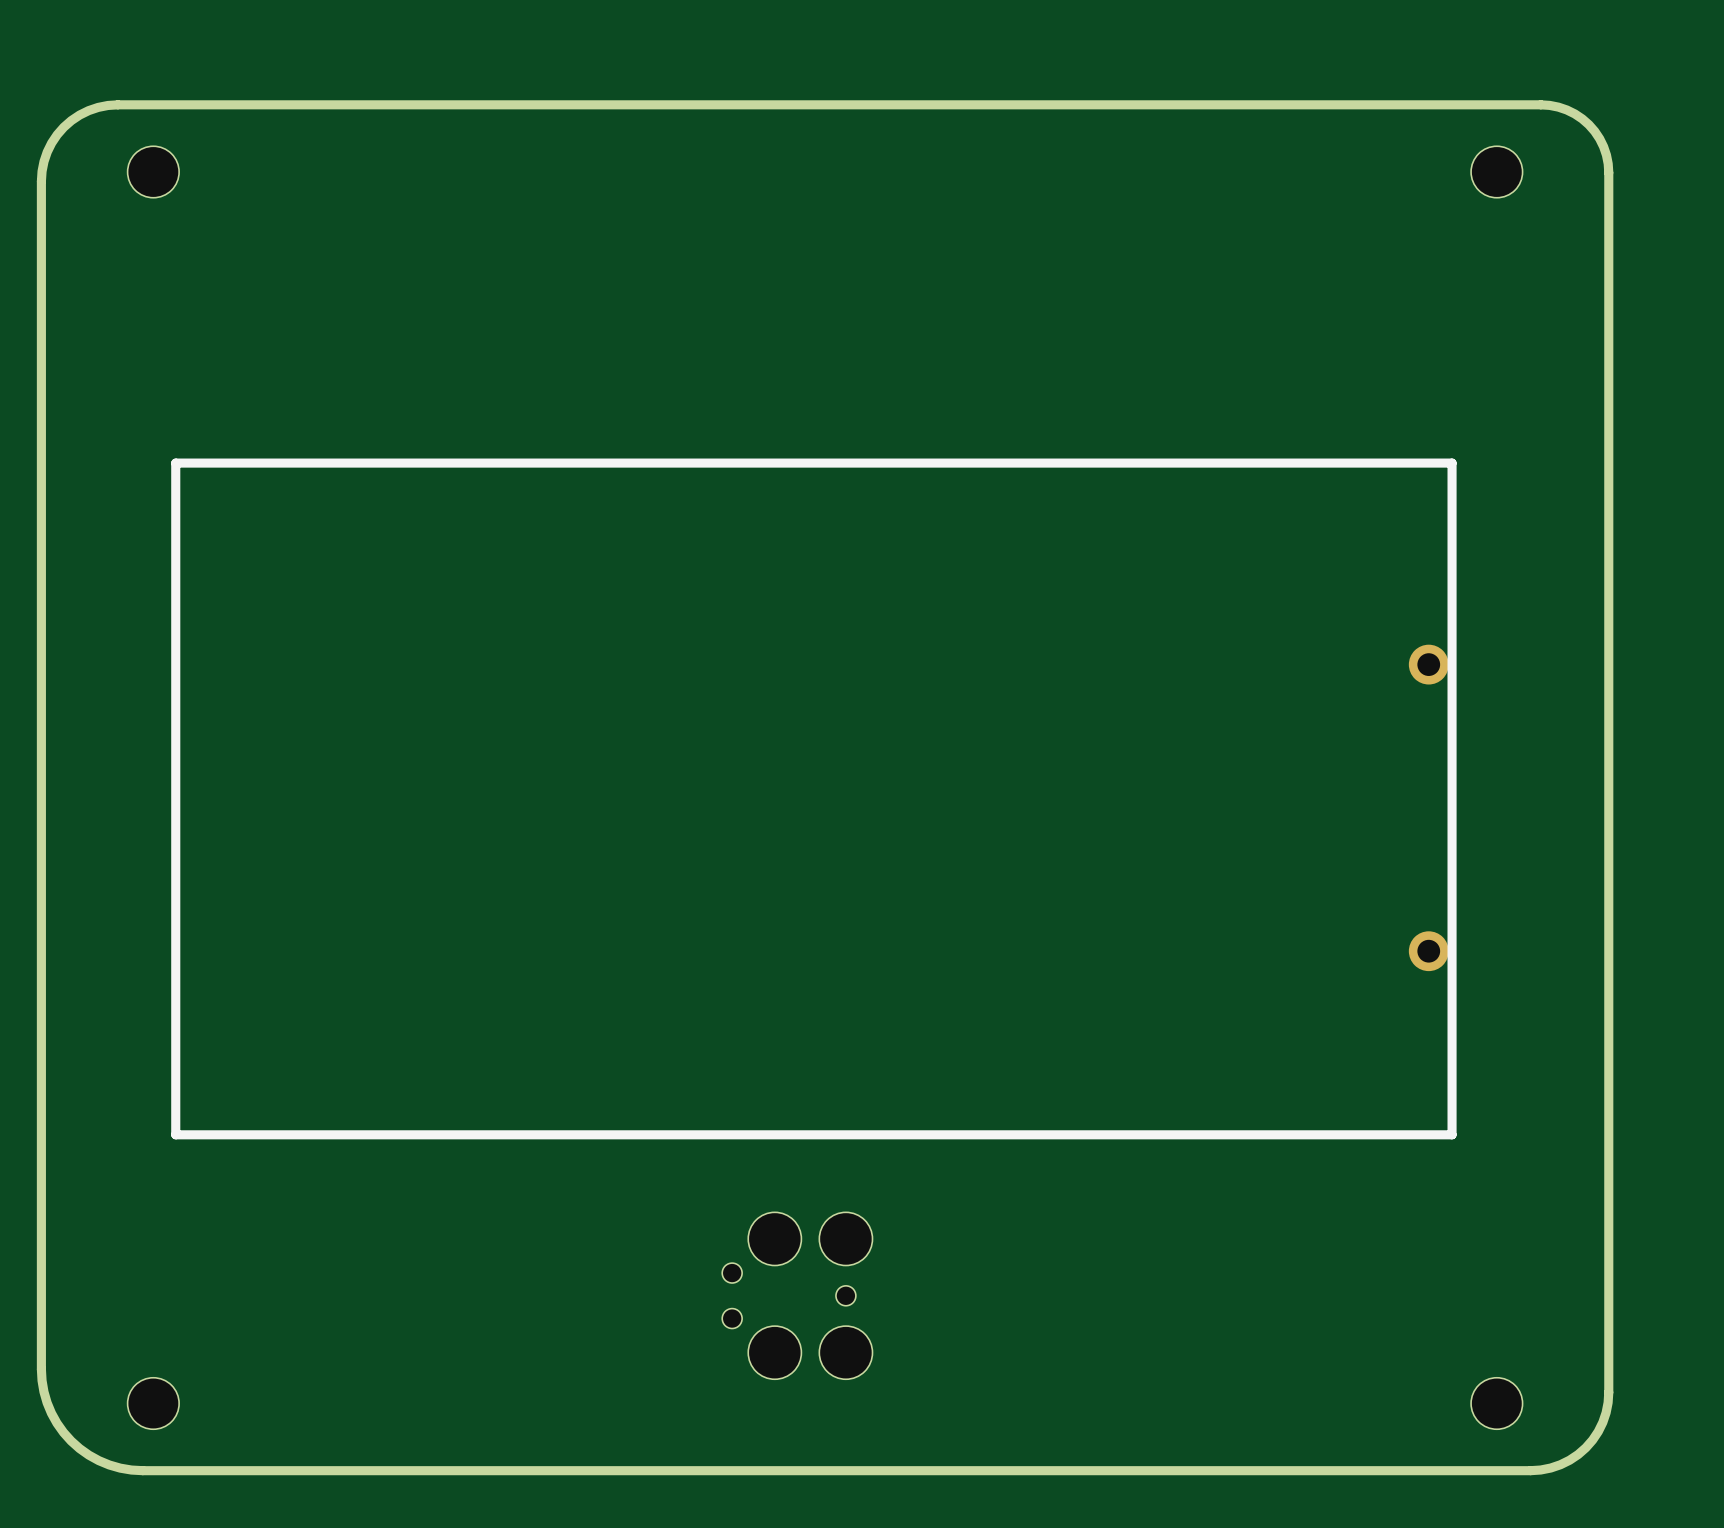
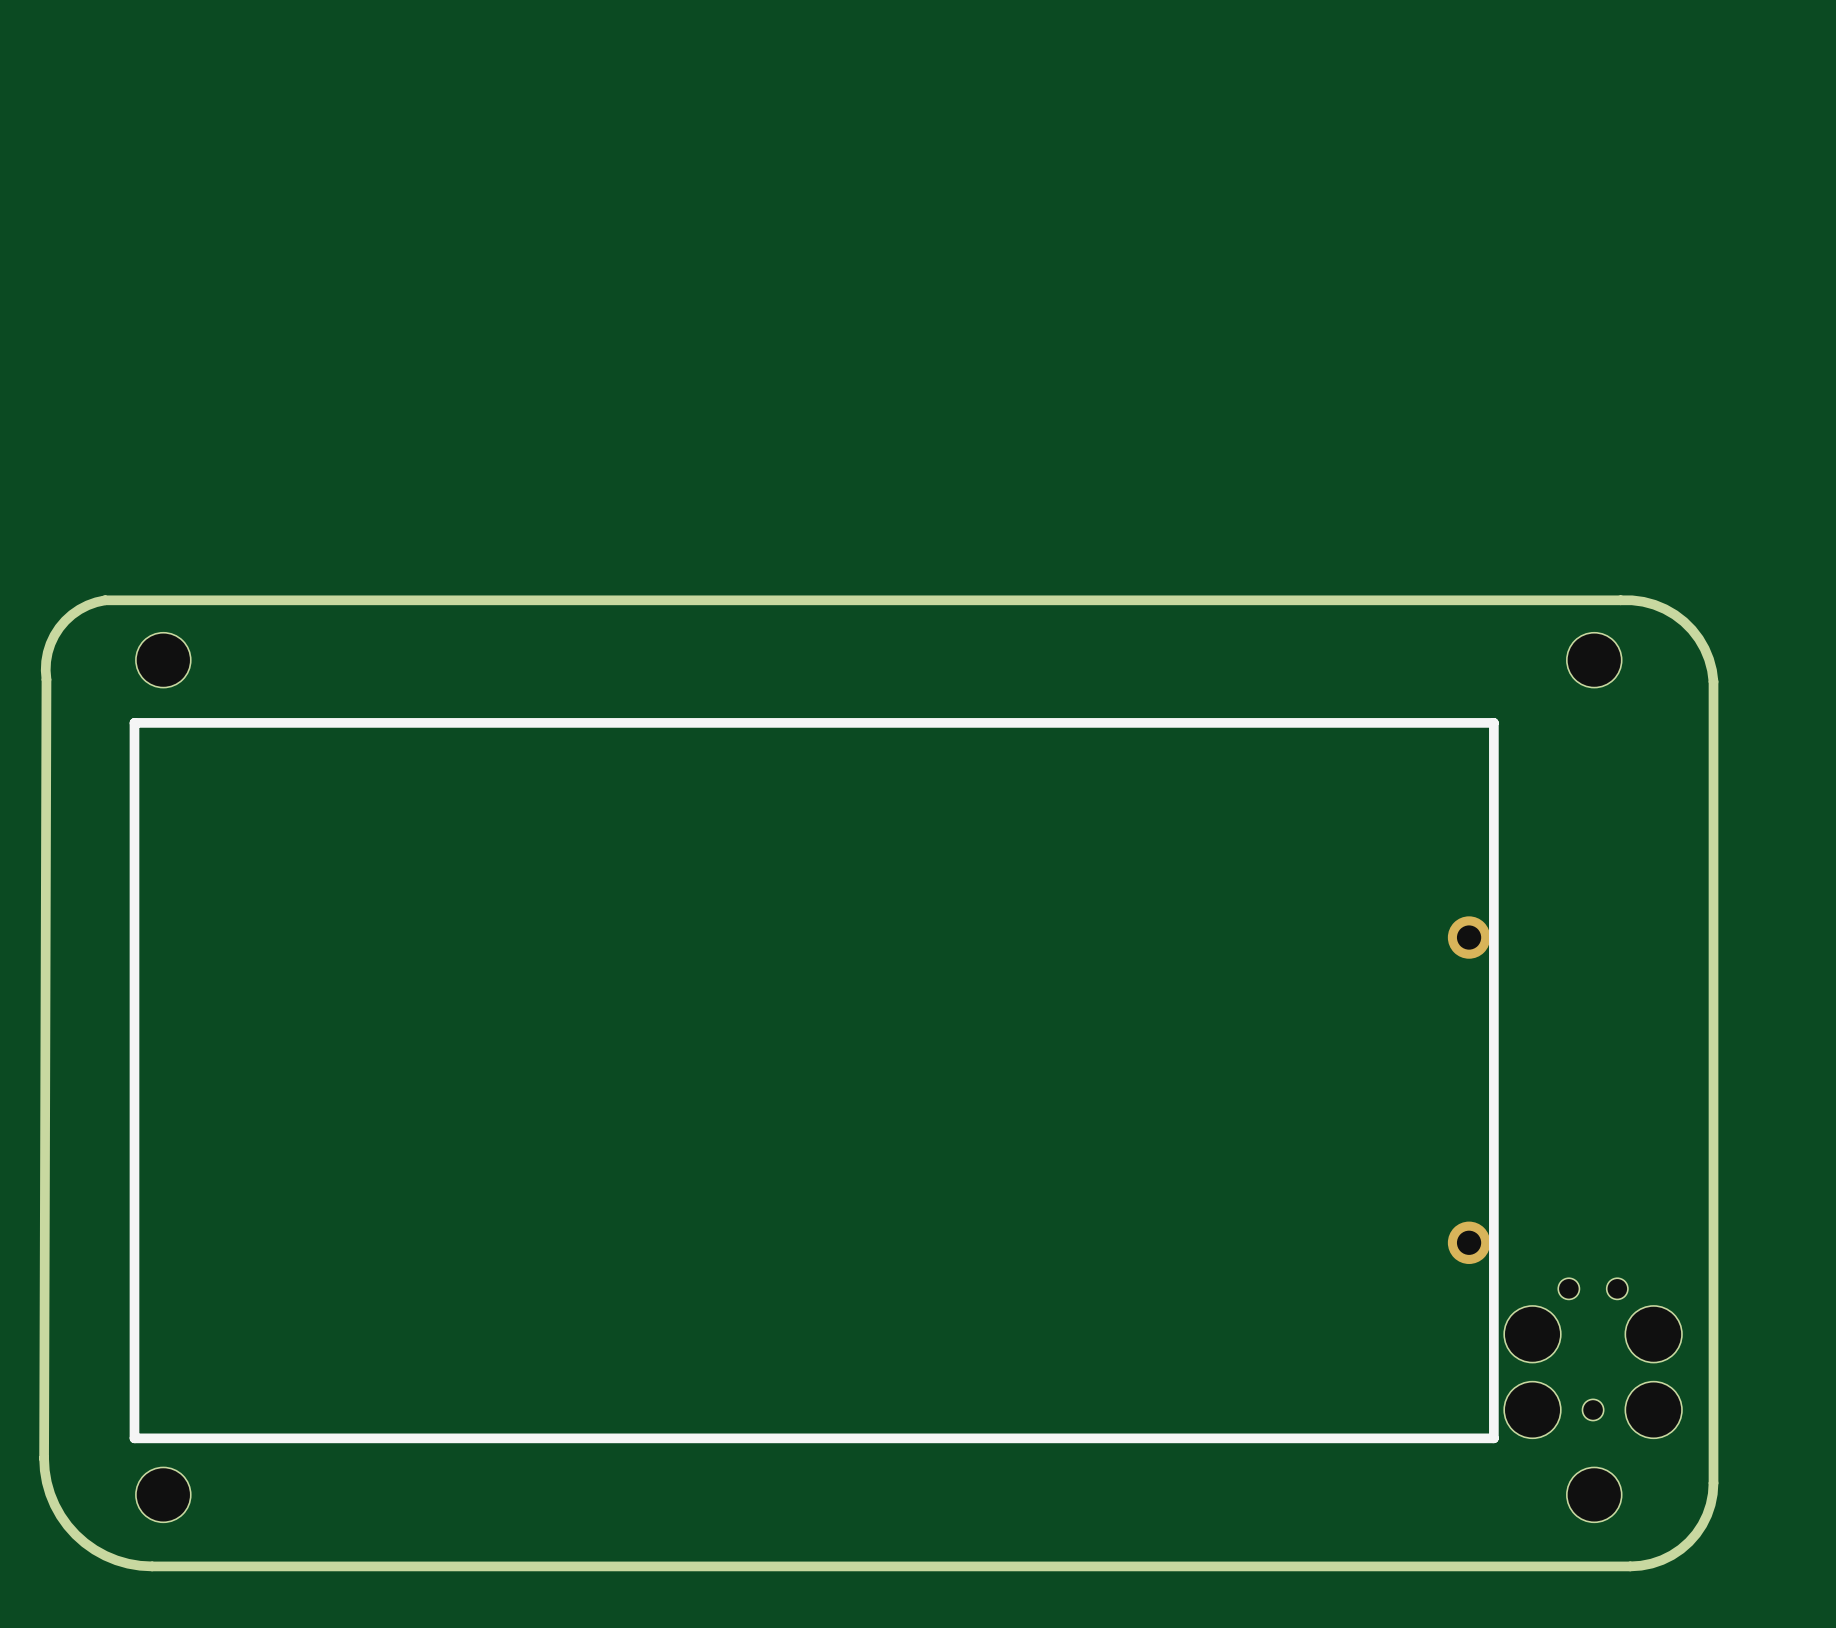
hole position: (153, 171) -> (163, 660)
hole position: (1496, 171) -> (1594, 660)
line: (1452, 463) (175, 463) (175, 1134) (1452, 1134) (1452, 463) -> (1493, 722) (134, 722) (134, 1438) (1493, 1438) (1493, 722)
board edge: (1608, 640) (1608, 163) (1603, 146) (1594, 131) (1582, 118) (1566, 109) (1540, 104) (117, 104) (88, 110) (63, 127) (51, 143) (44, 161) (41, 181) (41, 1369) -> (1713, 681) (1704, 648) (1683, 621) (1654, 604) (1632, 600) (105, 600) (87, 605) (71, 614) (59, 627) (50, 643) (46, 661) (44, 1458)
part: (1428, 664) -> none
part position: (1428, 951) -> (1469, 937)
part: none -> (1469, 1242)
part: none -> (1593, 1358)
part: (797, 1295) -> none

